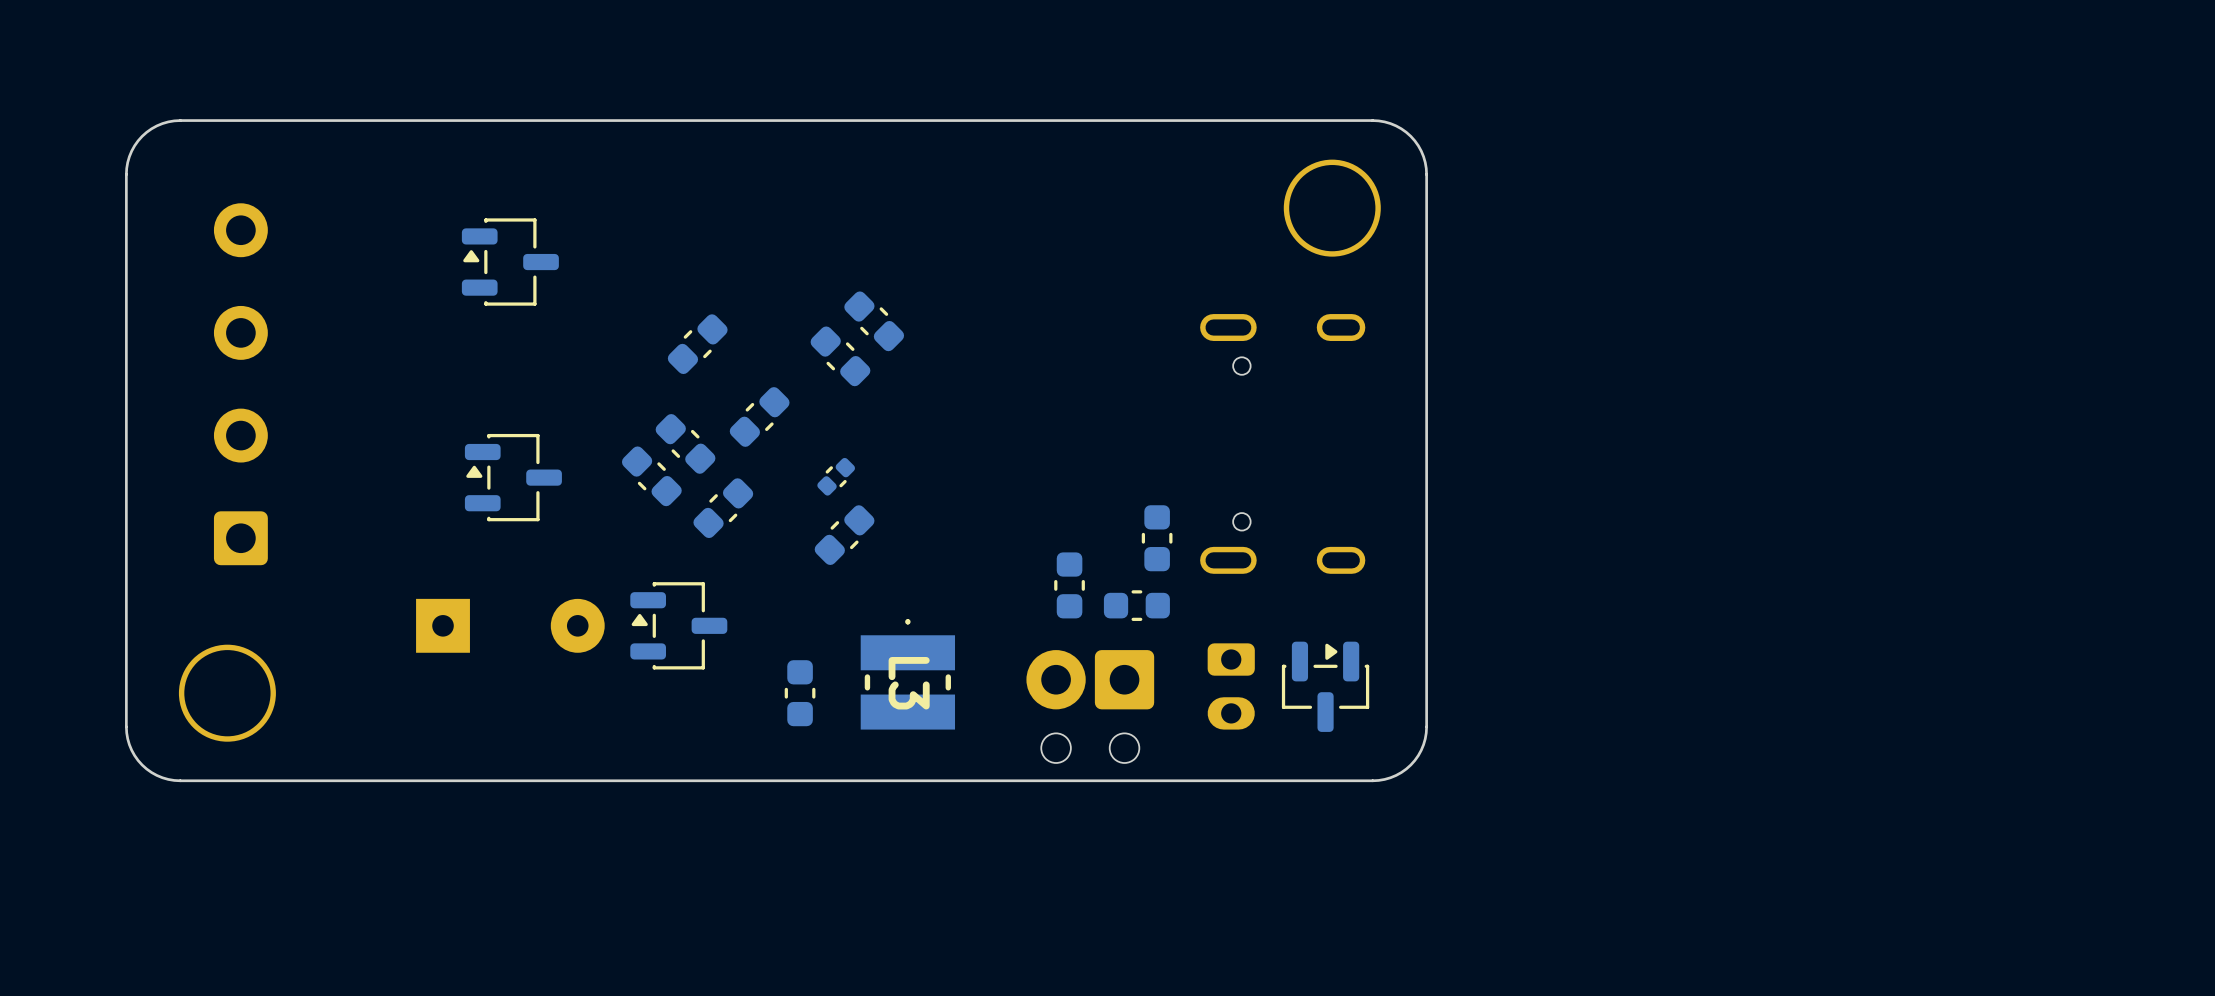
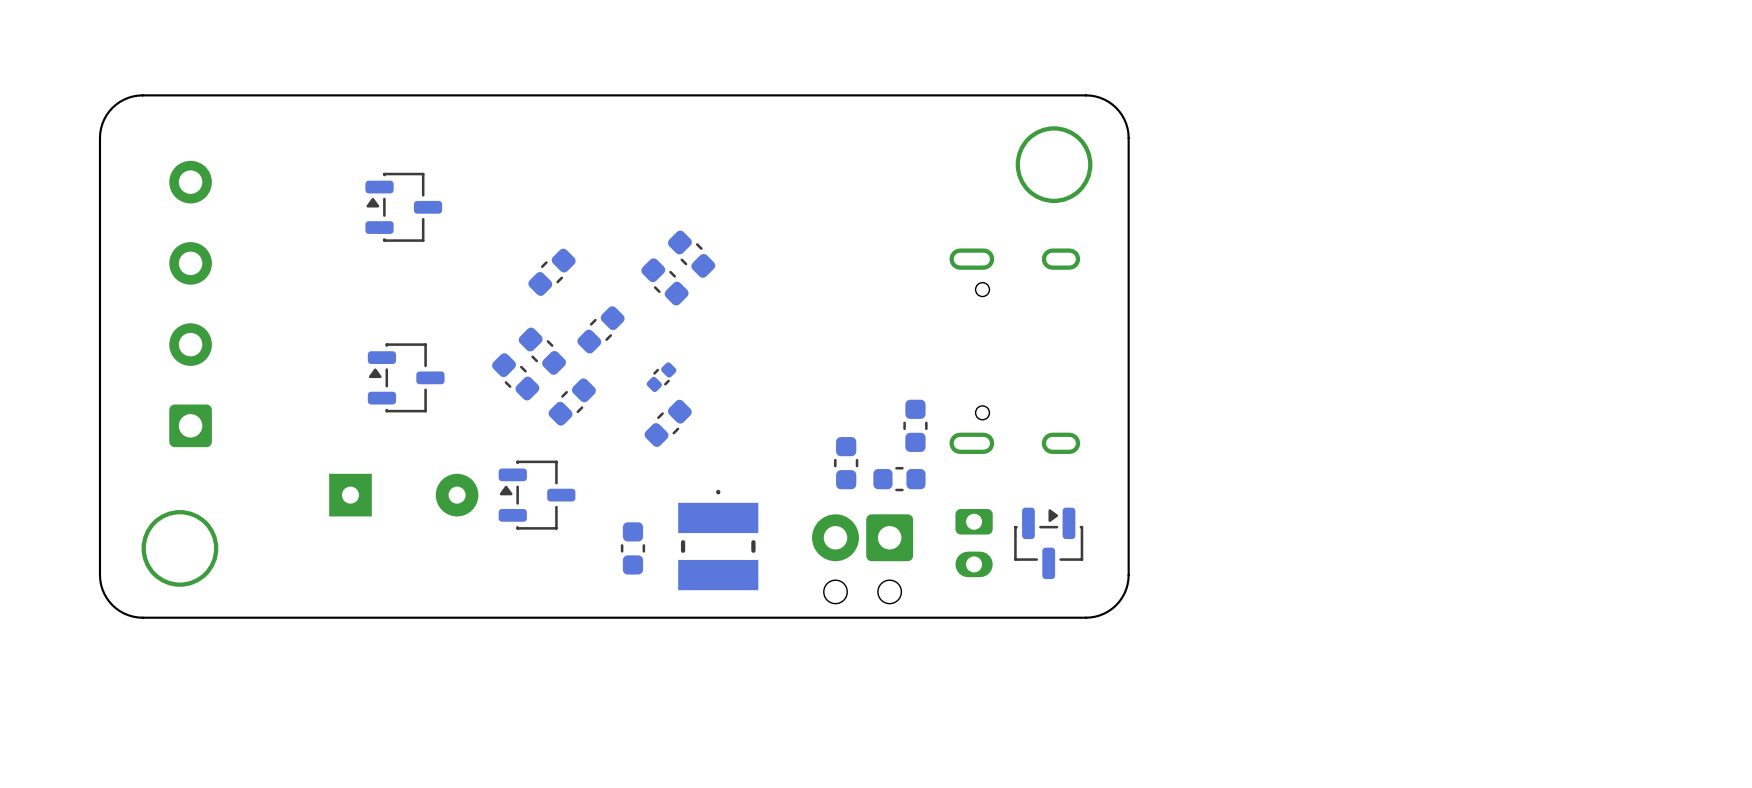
L3: (907, 674) -> none
part: none -> (718, 540)

